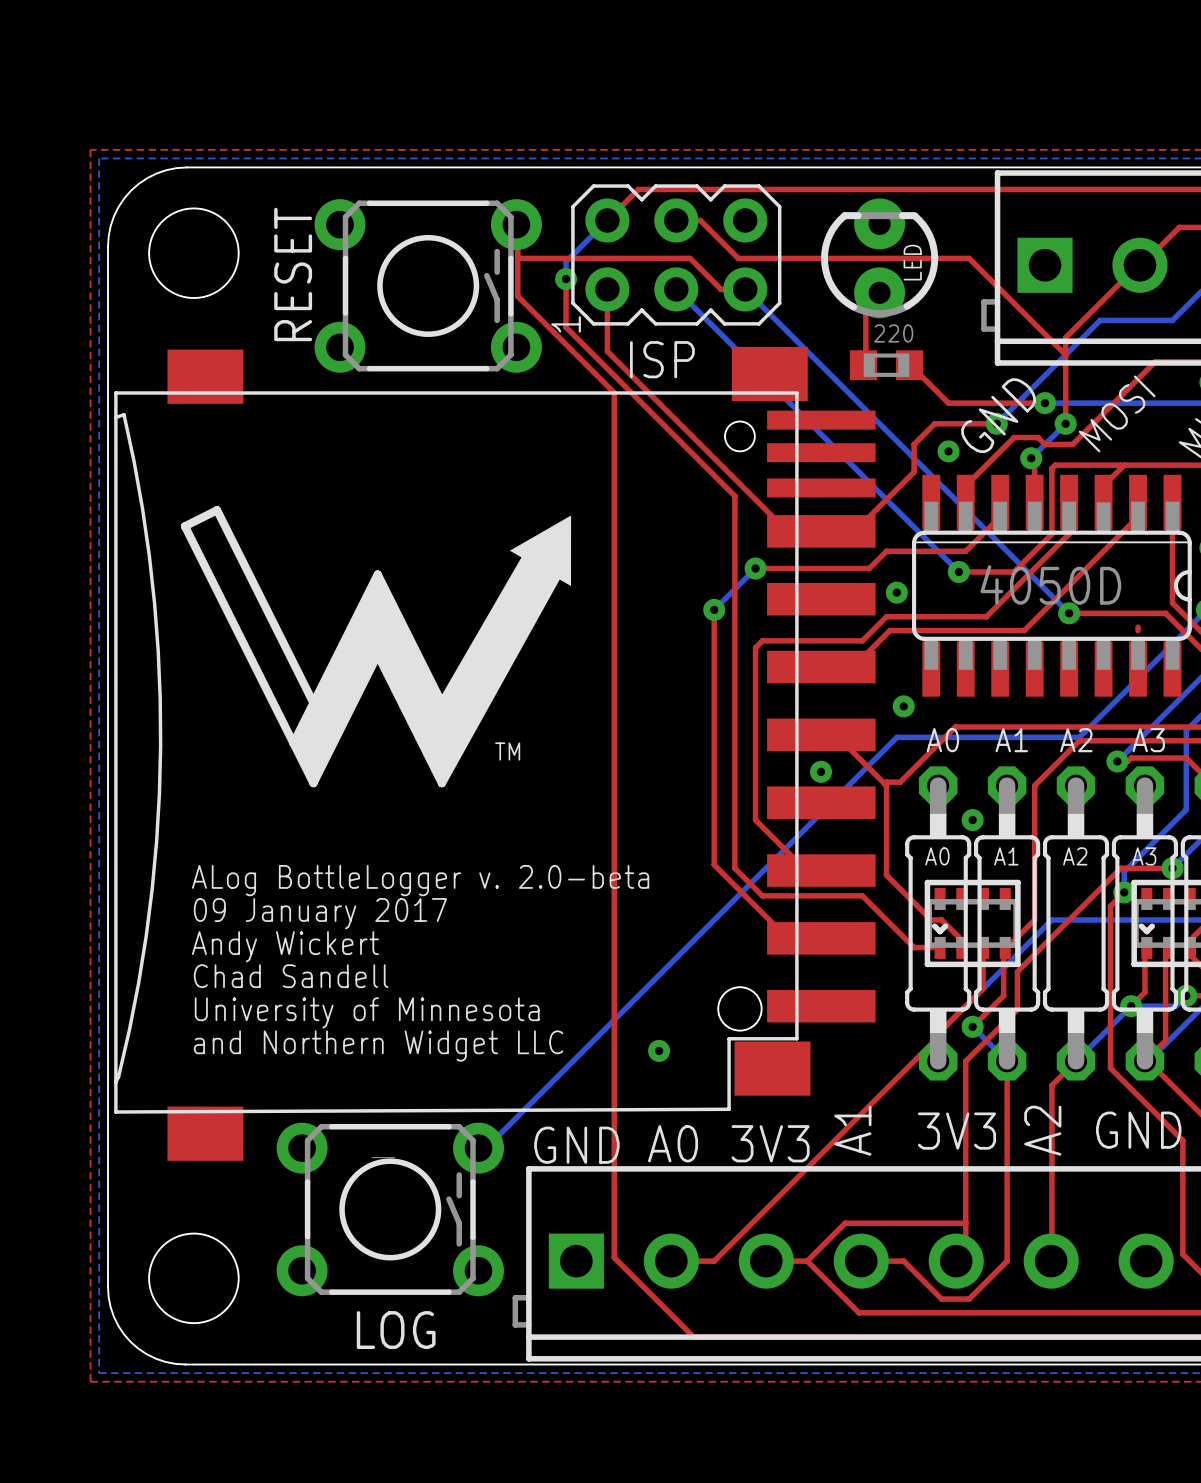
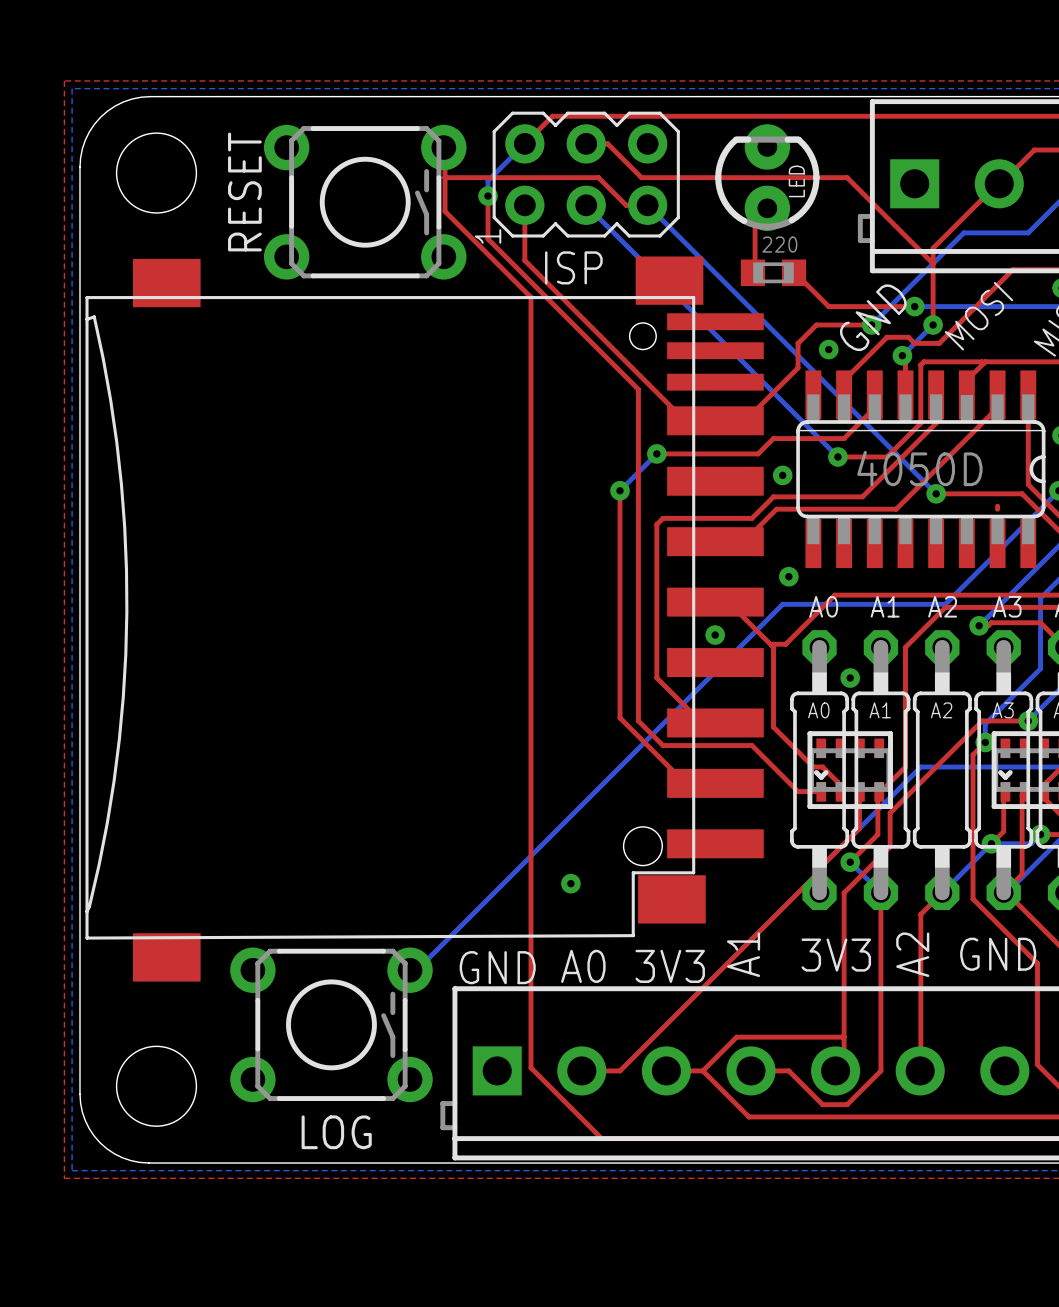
drawing: [180, 506, 572, 788] -> none
text: TM (507, 751) -> none
text: ALog BottleLogger v. 2.0-beta (420, 880) -> none
text: 09 January 2017 (320, 913) -> none
text: Andy Wickert (285, 946) -> none
text: Chad Sandell (291, 976) -> none
text: University of Minnesota (367, 1012) -> none
text: and Northern Widget LLC (378, 1046) -> none
drawing: [371, 1157, 395, 1159] -> none

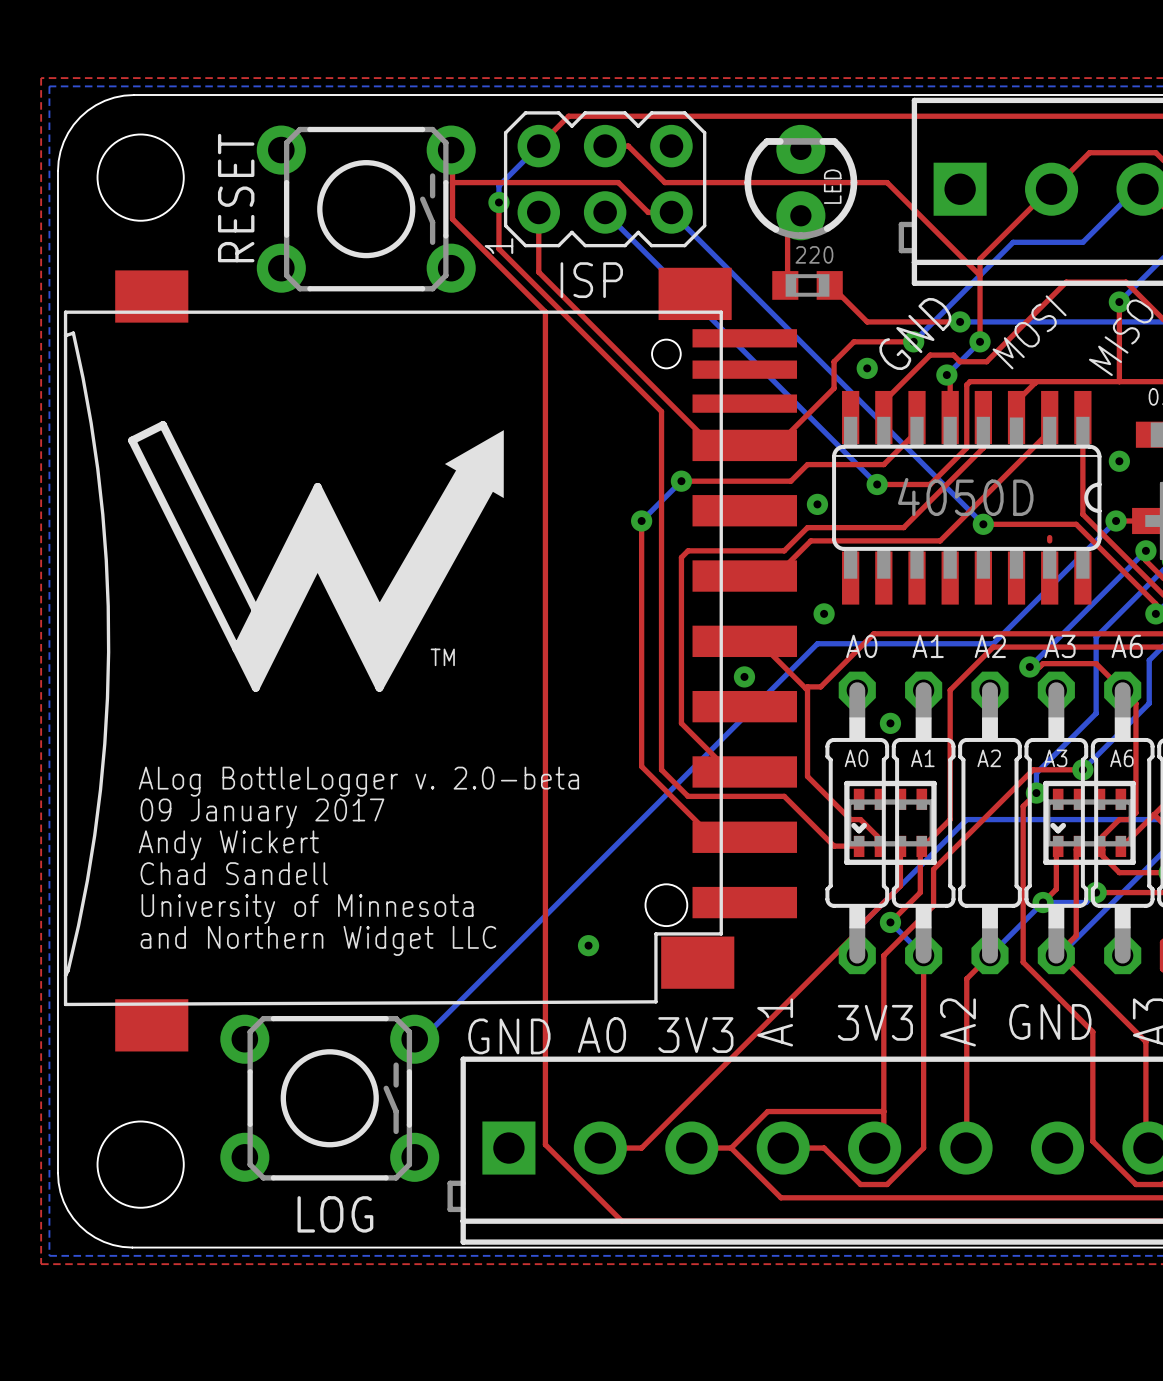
drawing: none -> [128, 421, 504, 692]
text: none -> TM (442, 657)
text: none -> ALog BottleLogger v. 2.0-beta (358, 781)
text: none -> 09 January 2017 (262, 813)
text: none -> Andy Wickert (228, 845)
text: none -> Chad Sandell (234, 873)
text: none -> University of Minnesota (307, 909)
text: none -> and Northern Widget LLC (318, 940)

